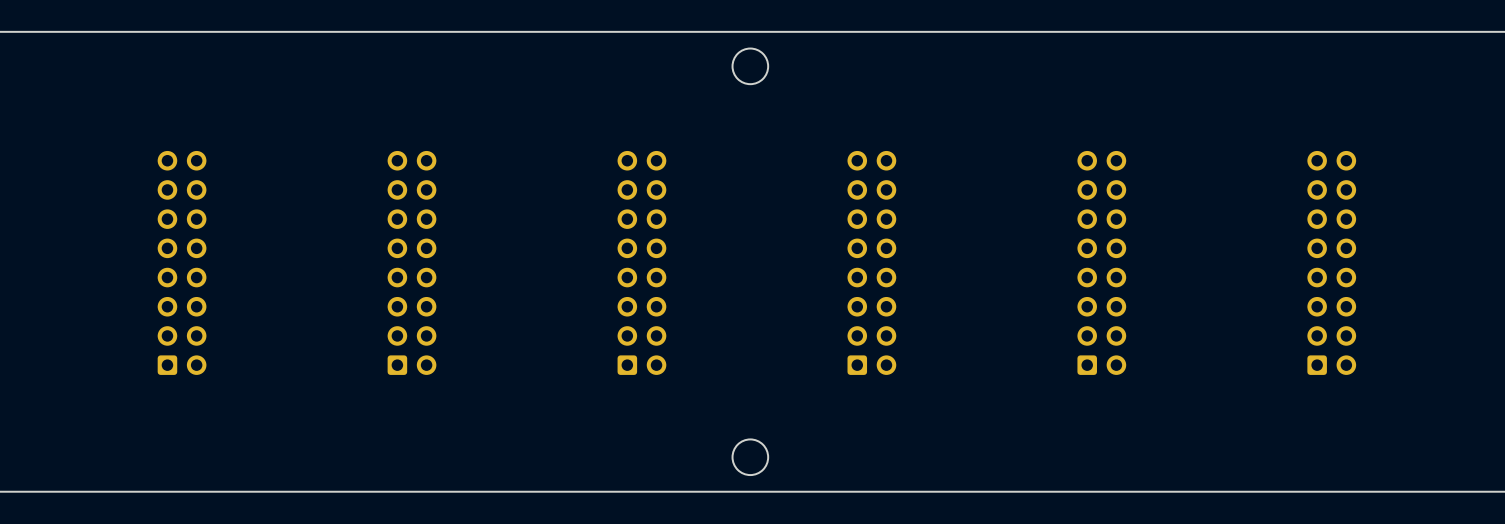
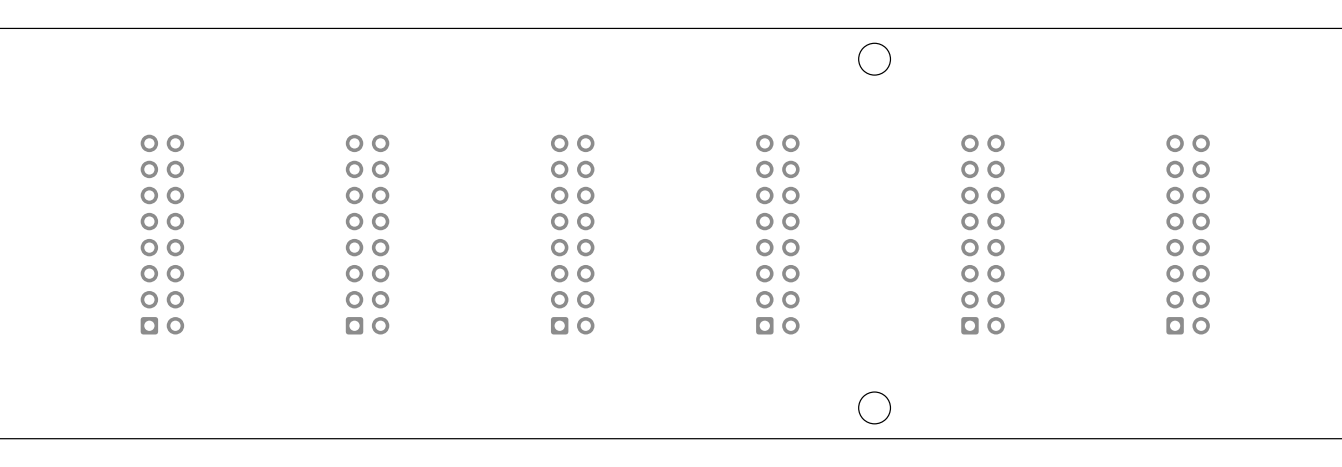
round board edge: [731, 47, 769, 85] -> none
round board edge: none -> [858, 42, 891, 76]
round board edge: [731, 438, 769, 476] -> none
round board edge: none -> [858, 391, 891, 425]

